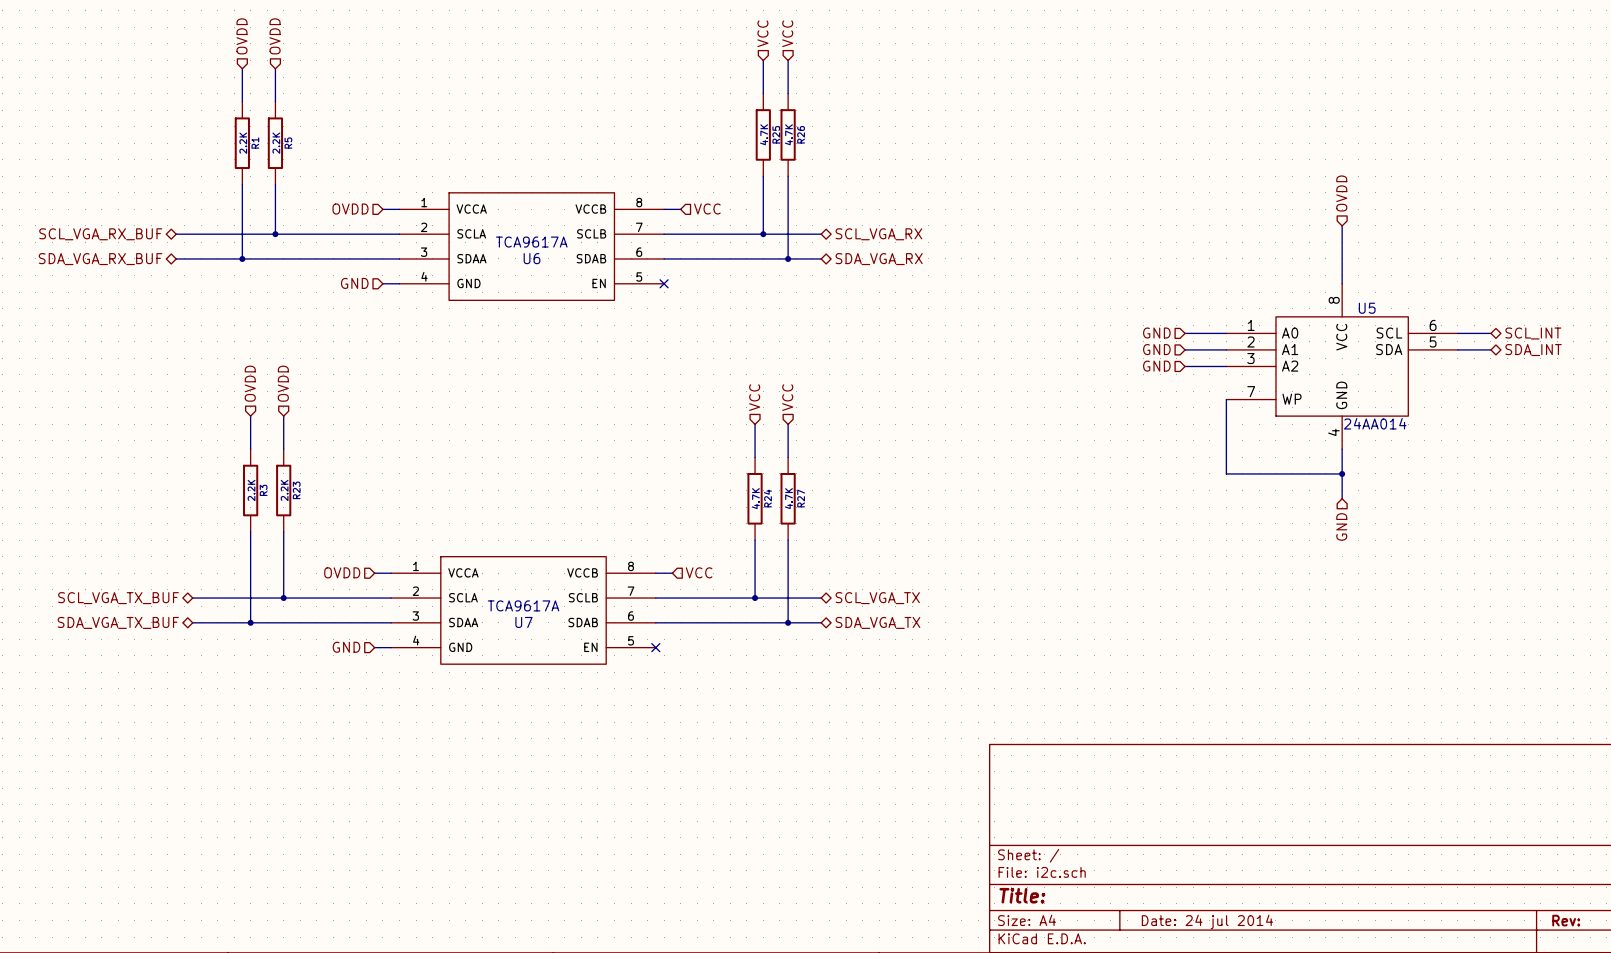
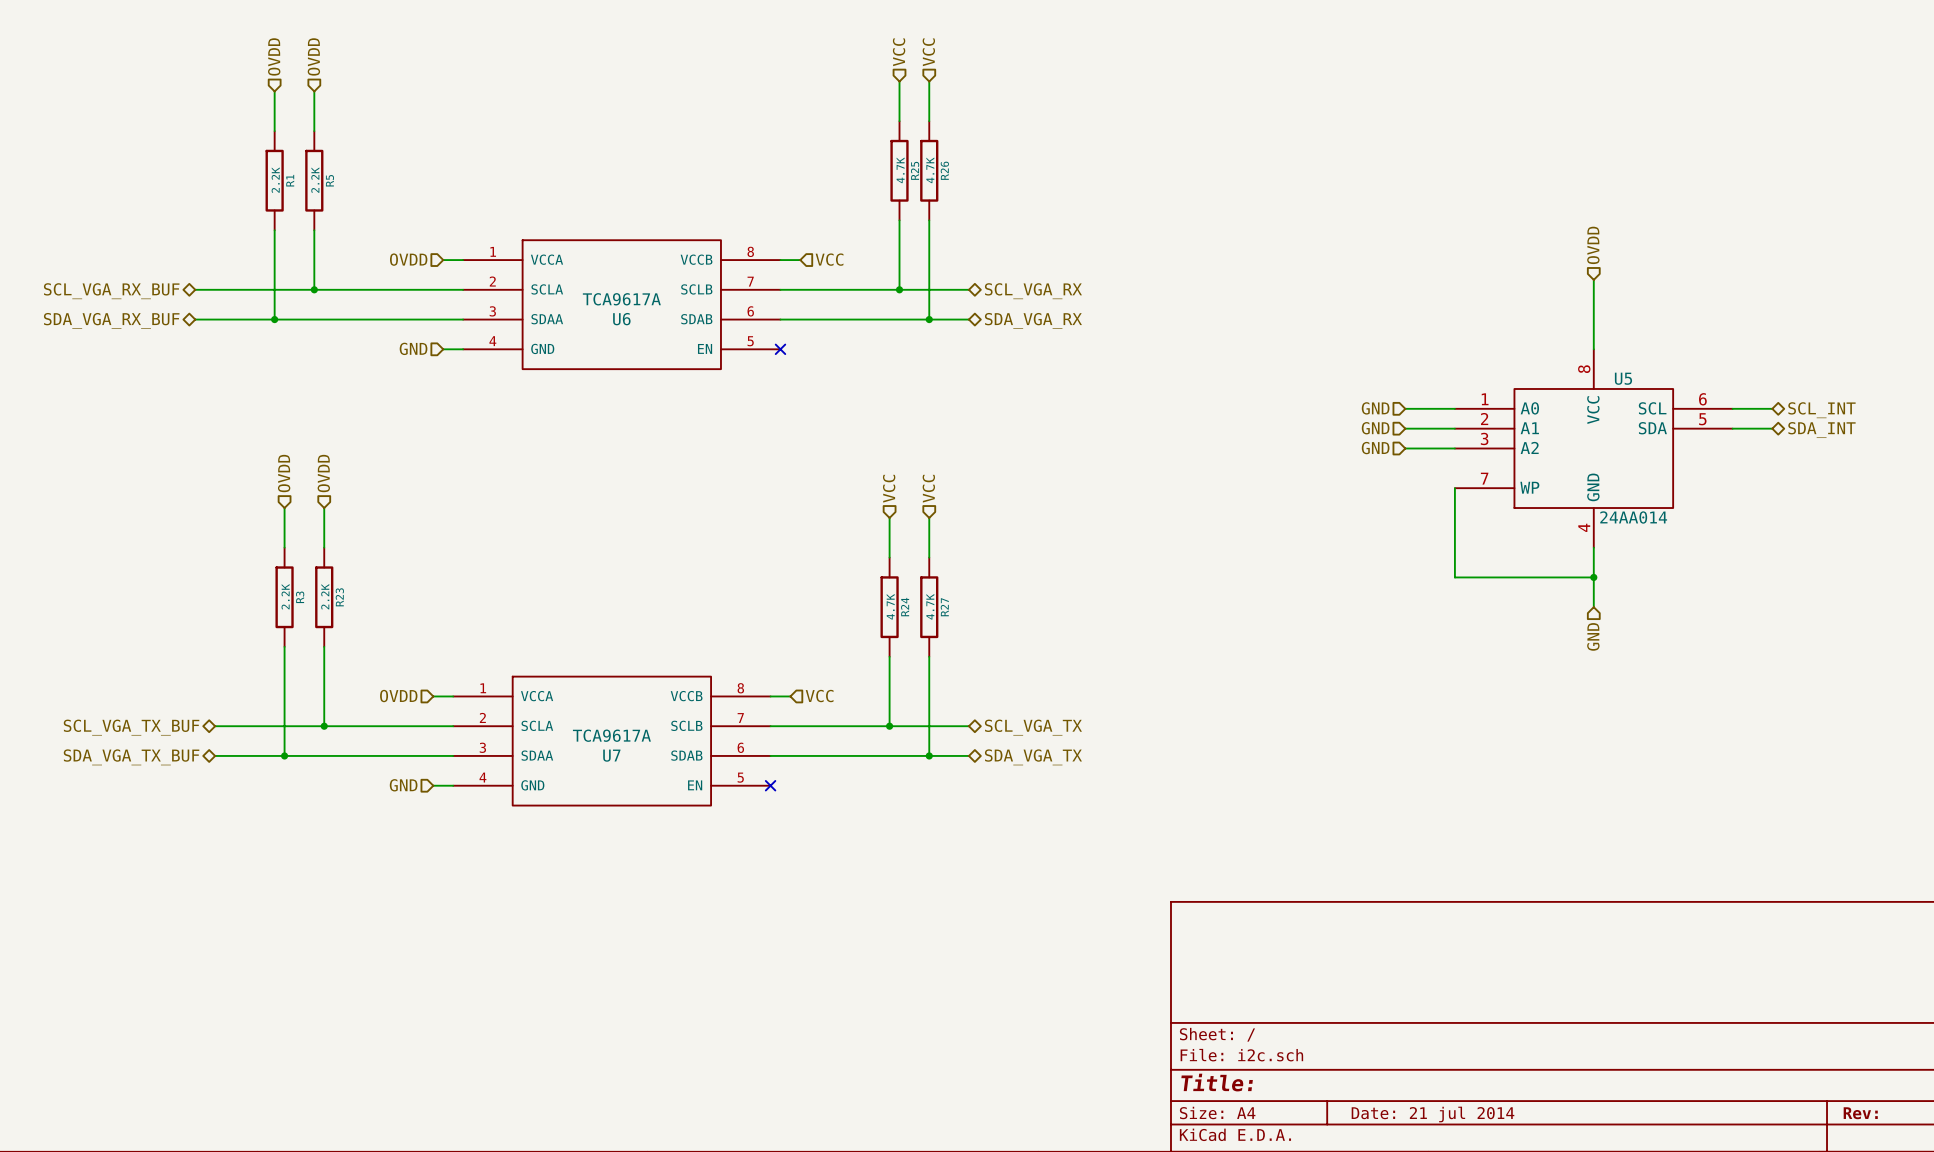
title block: Date: 24 jul 2014 (1207, 921) -> Date: 21 jul 2014 (1432, 1114)

